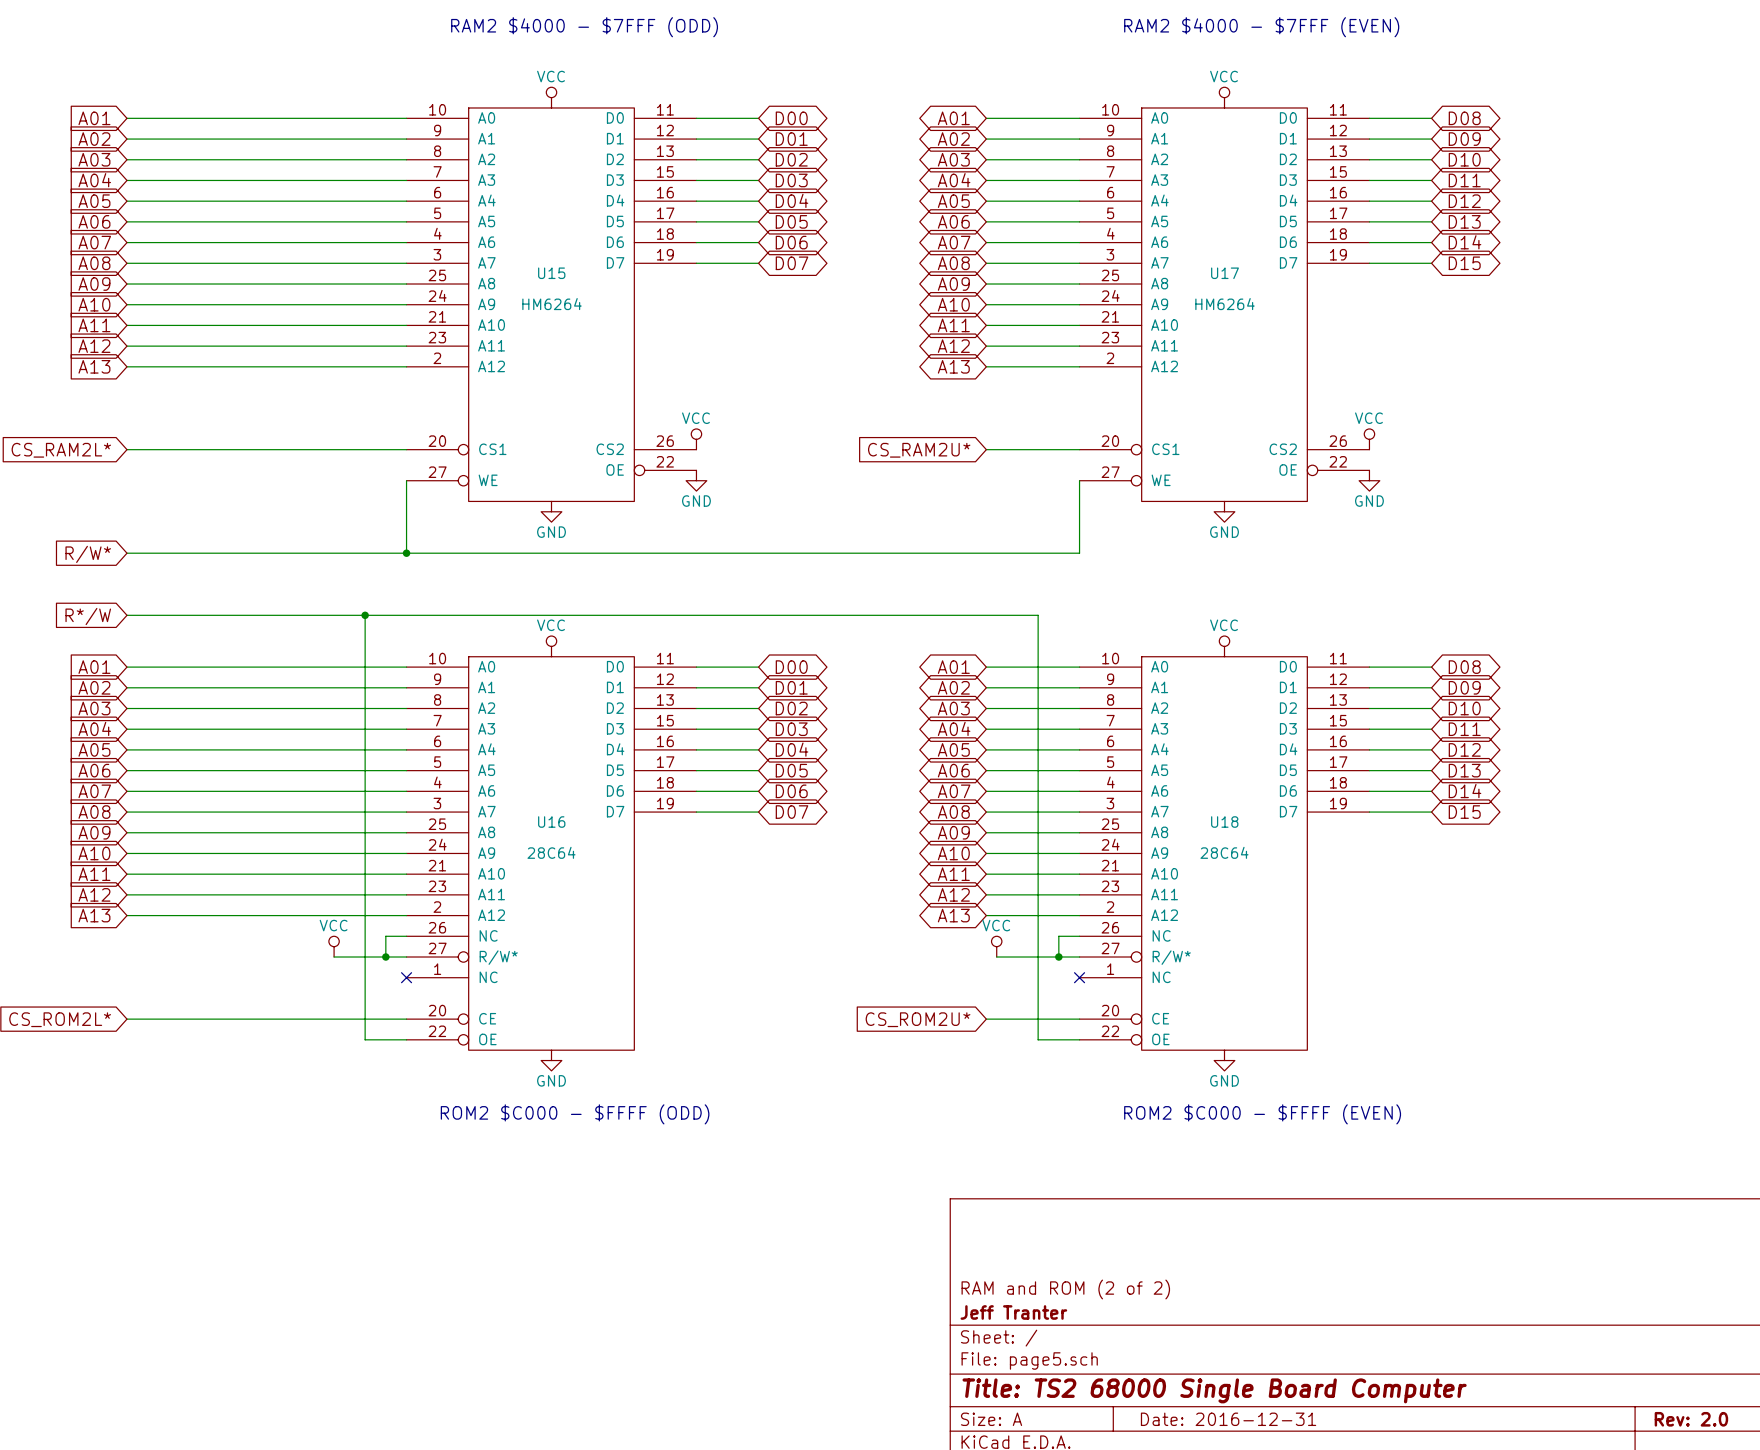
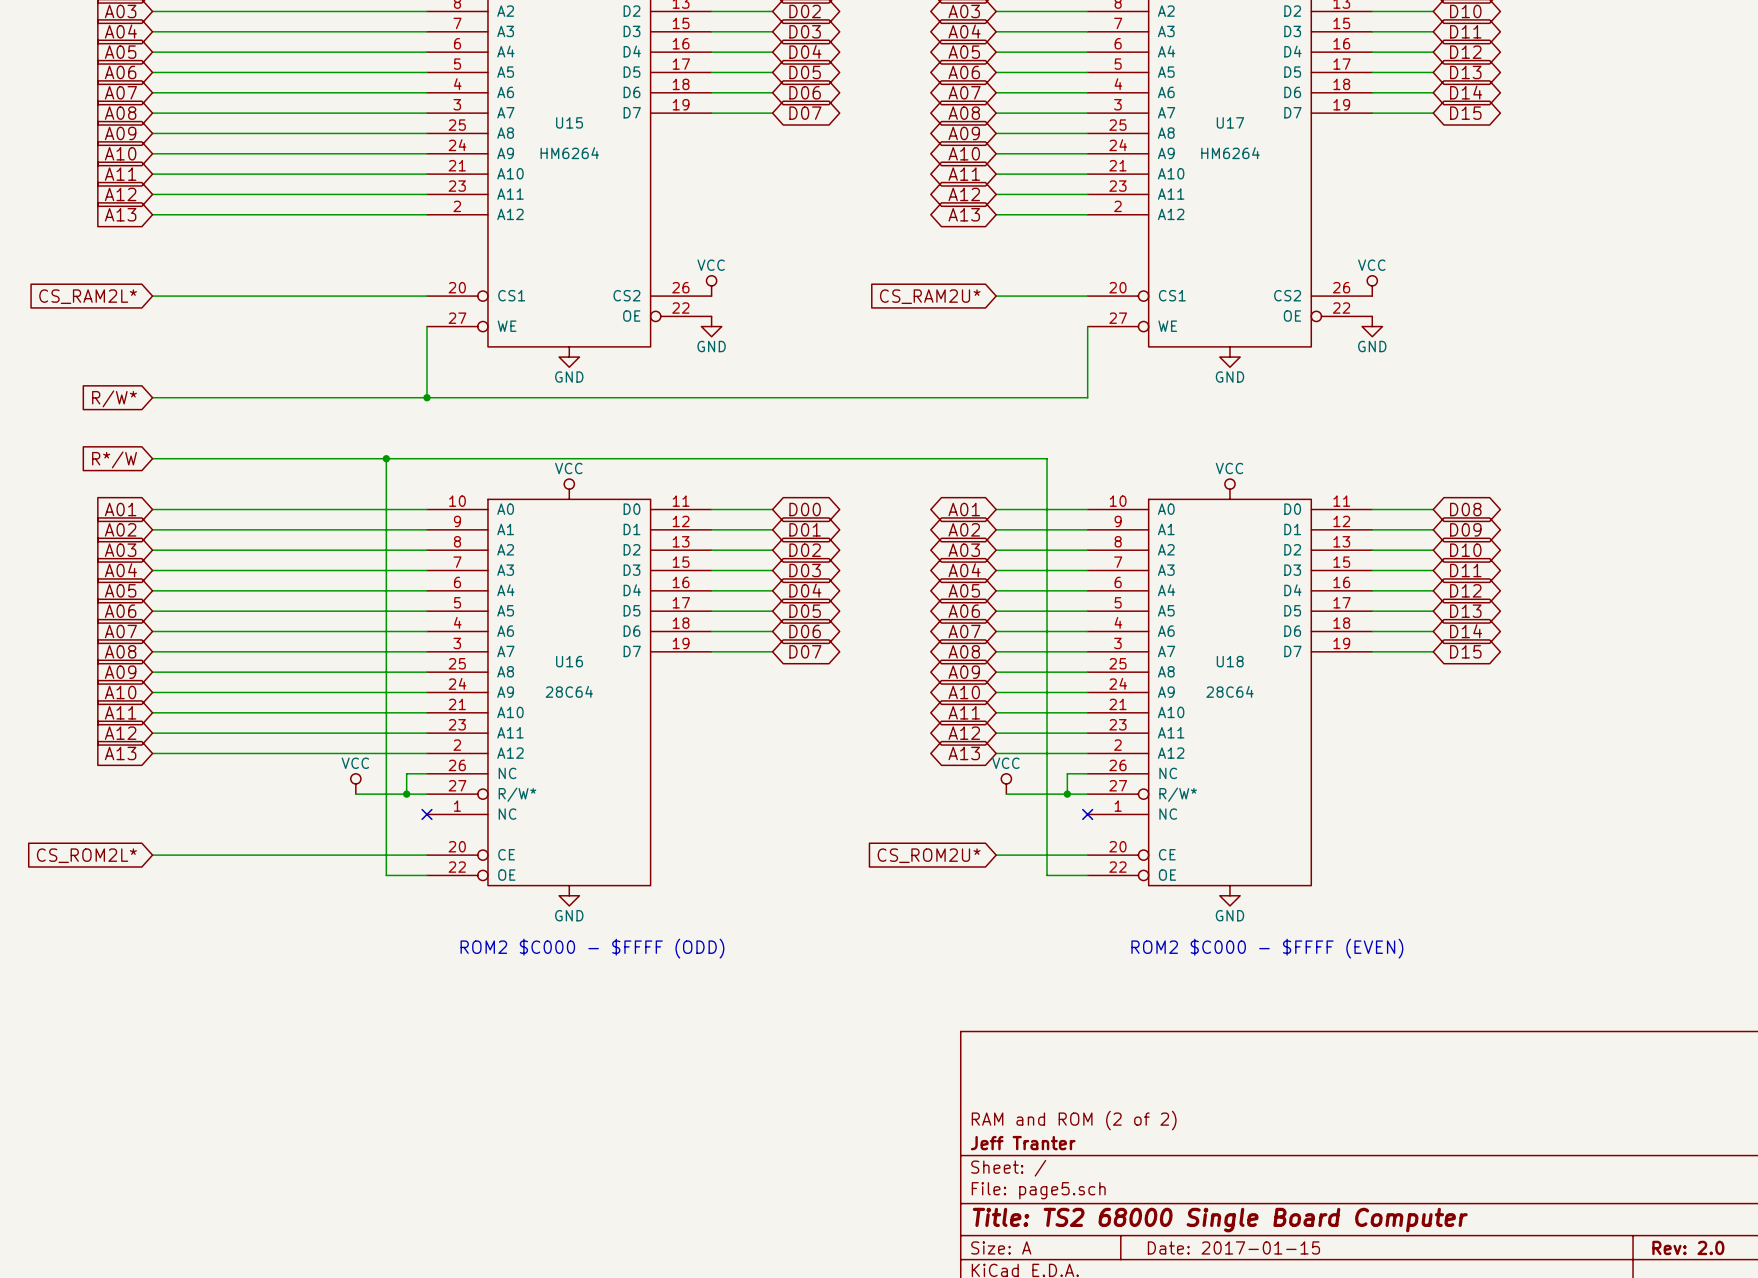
title block: Date: 2016-12-31 (1228, 1419) -> Date: 2017-01-15 (1233, 1247)

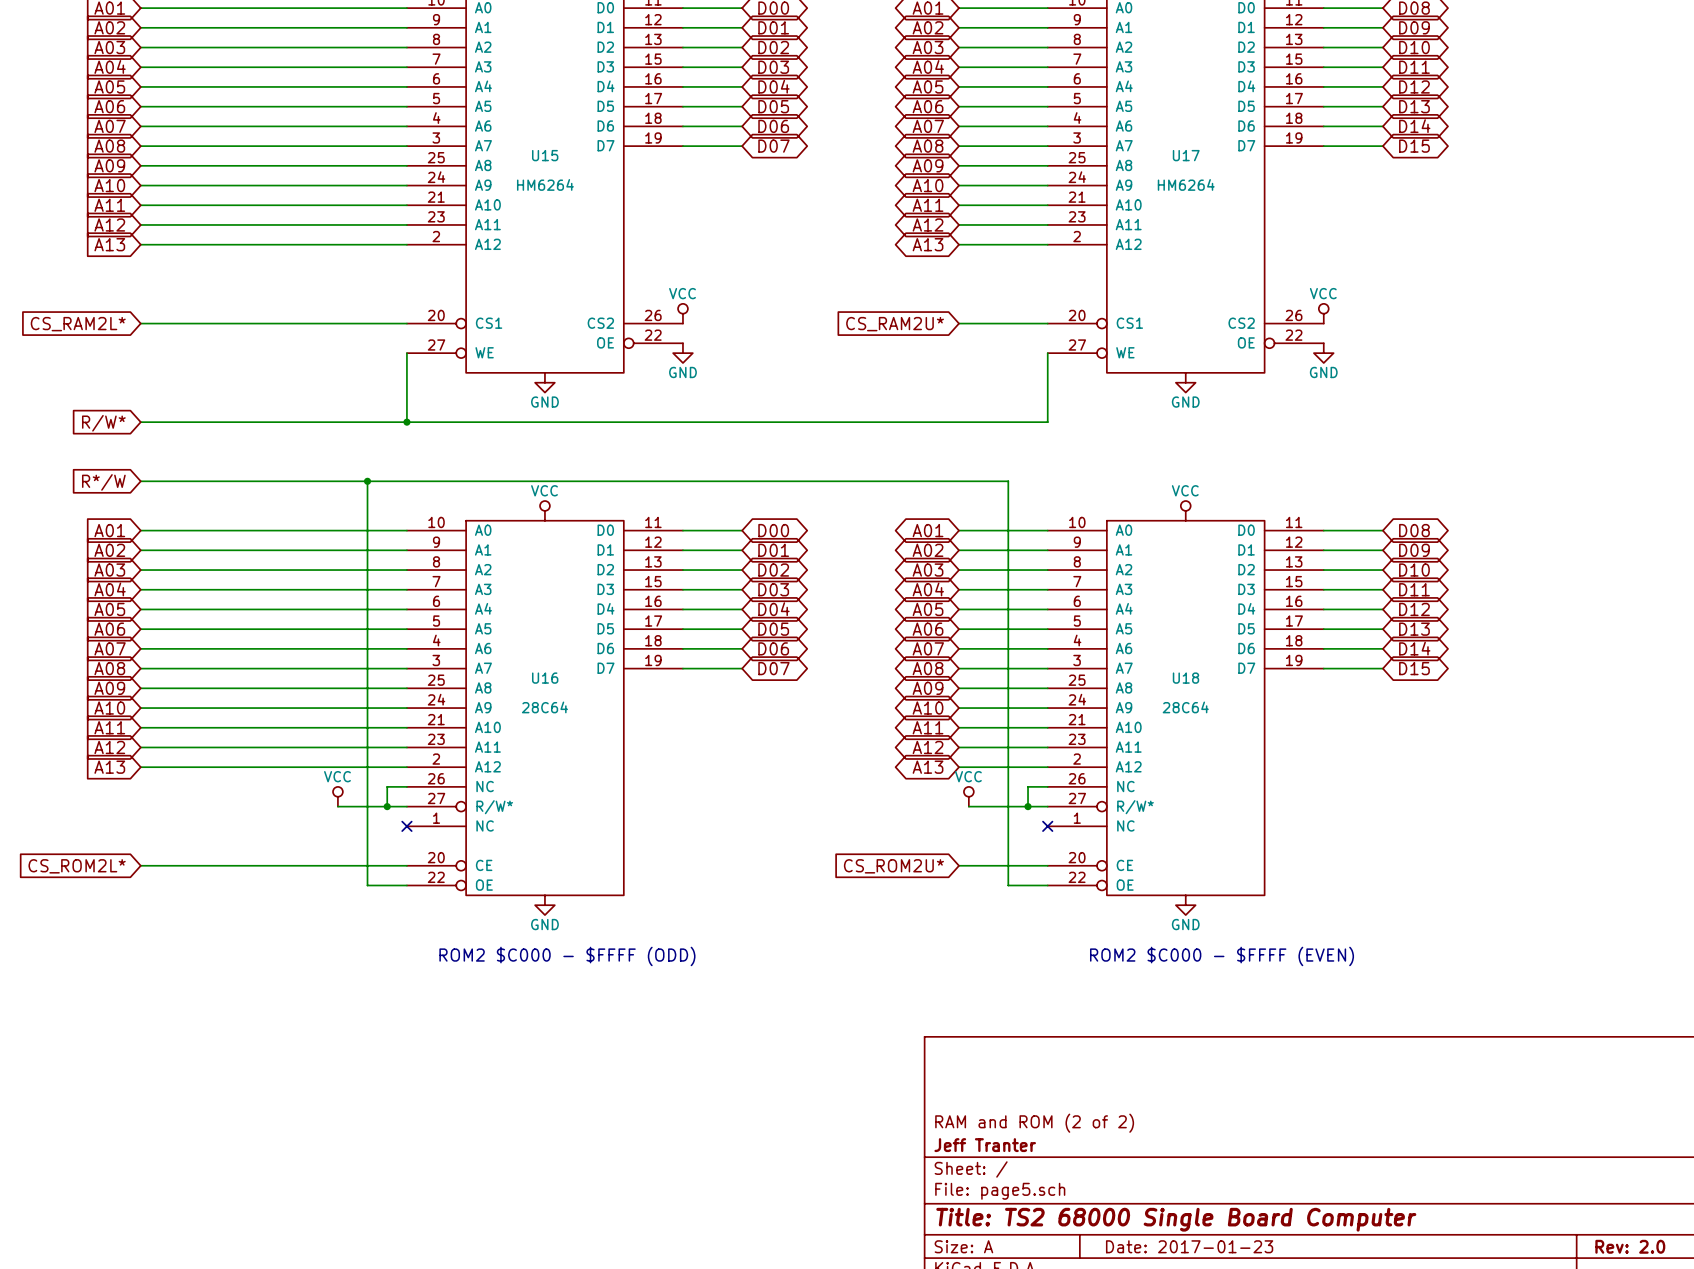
title block: Date: 2017-01-15 (1233, 1247) -> Date: 2017-01-23 (1189, 1246)

